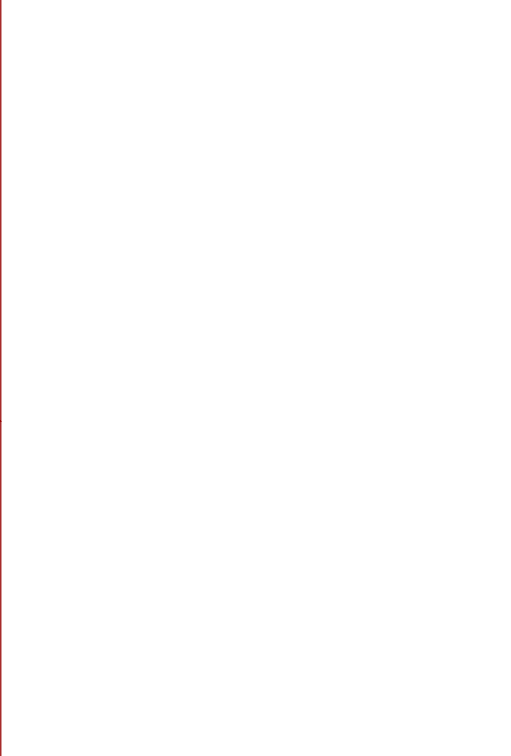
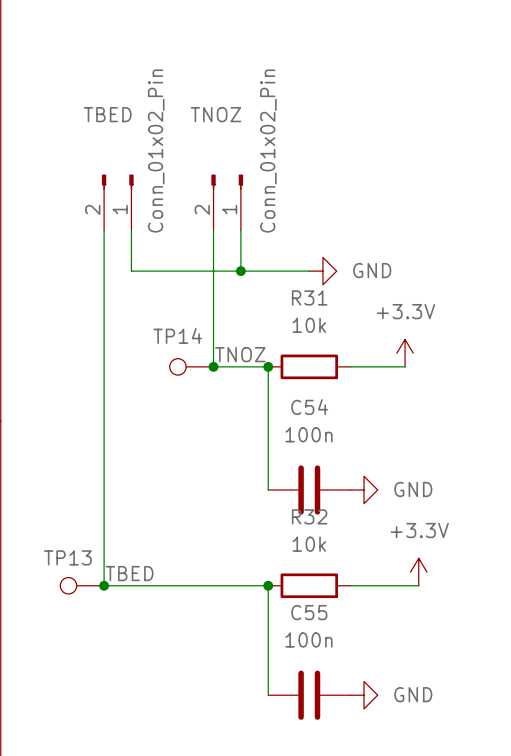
TBED: none -> Conn_01x02_Pin (117, 202)
TNOZ: none -> Conn_01x02_Pin (227, 202)
wire: none -> (104, 230) (104, 585) (268, 585) (268, 695)
wire: none -> (131, 230) (131, 271) (309, 271)
wire: none -> (213, 230) (213, 366) (268, 366) (268, 490)
wire: none -> (240, 230) (240, 271)
junction: none -> (240, 271)
power symbol: none -> GND (322, 271)
power symbol: none -> +3.3V (405, 353)
label: none -> TNOZ (240, 354)
TP14: none -> (191, 366)
junction: none -> (213, 366)
junction: none -> (268, 366)
R31: none -> 10k (309, 366)
wire: none -> (350, 366) (405, 366)
C54: none -> 100n (309, 490)
power symbol: none -> GND (364, 490)
power symbol: none -> +3.3V (418, 572)
label: none -> TBED (129, 573)
TP13: none -> (82, 585)
junction: none -> (104, 585)
junction: none -> (268, 585)
R32: none -> 10k (309, 585)
wire: none -> (350, 585) (418, 585)
C55: none -> 100n (309, 695)
power symbol: none -> GND (364, 695)

